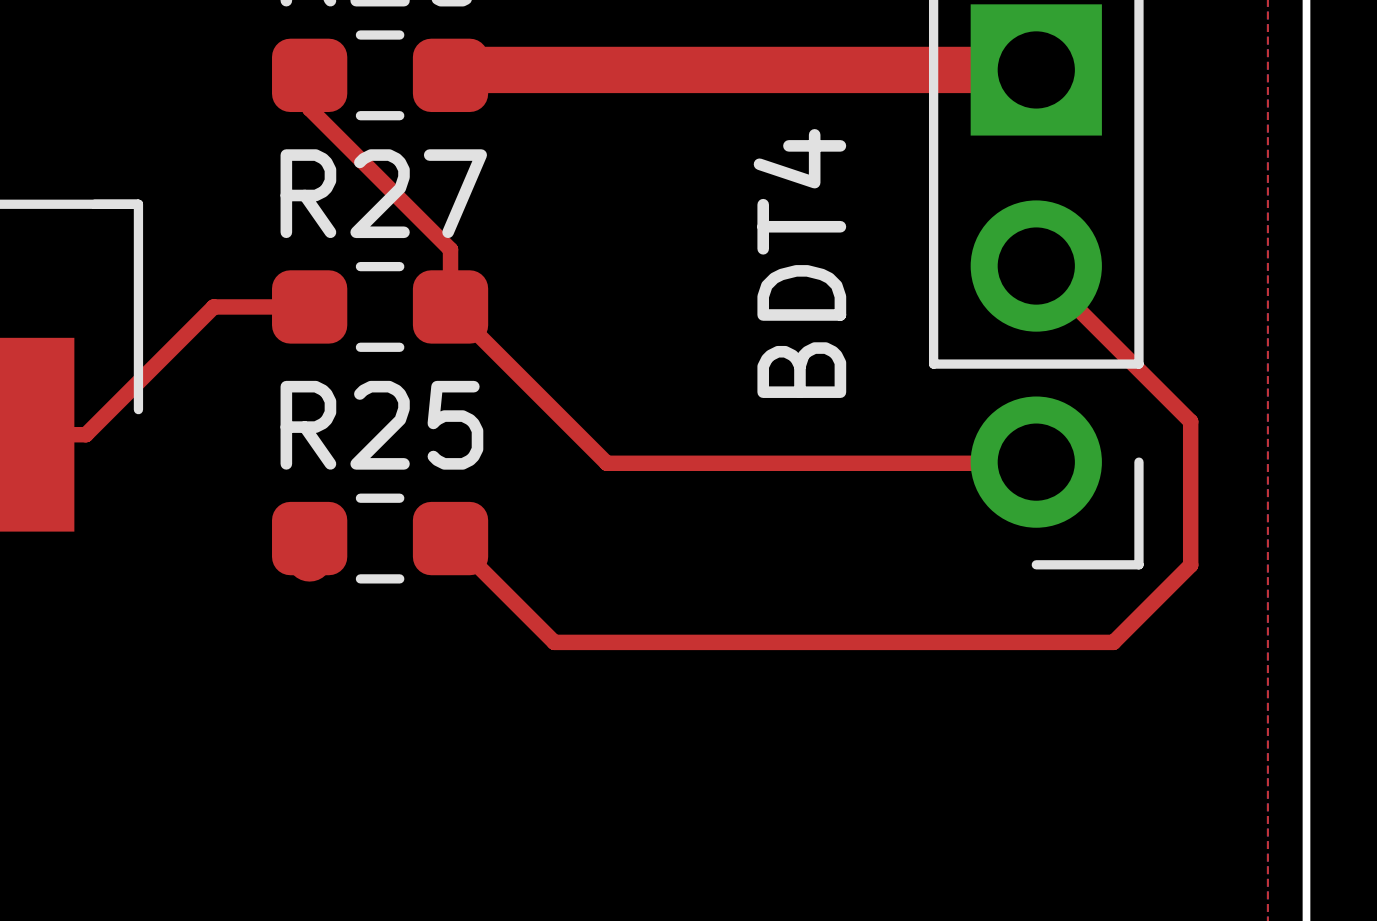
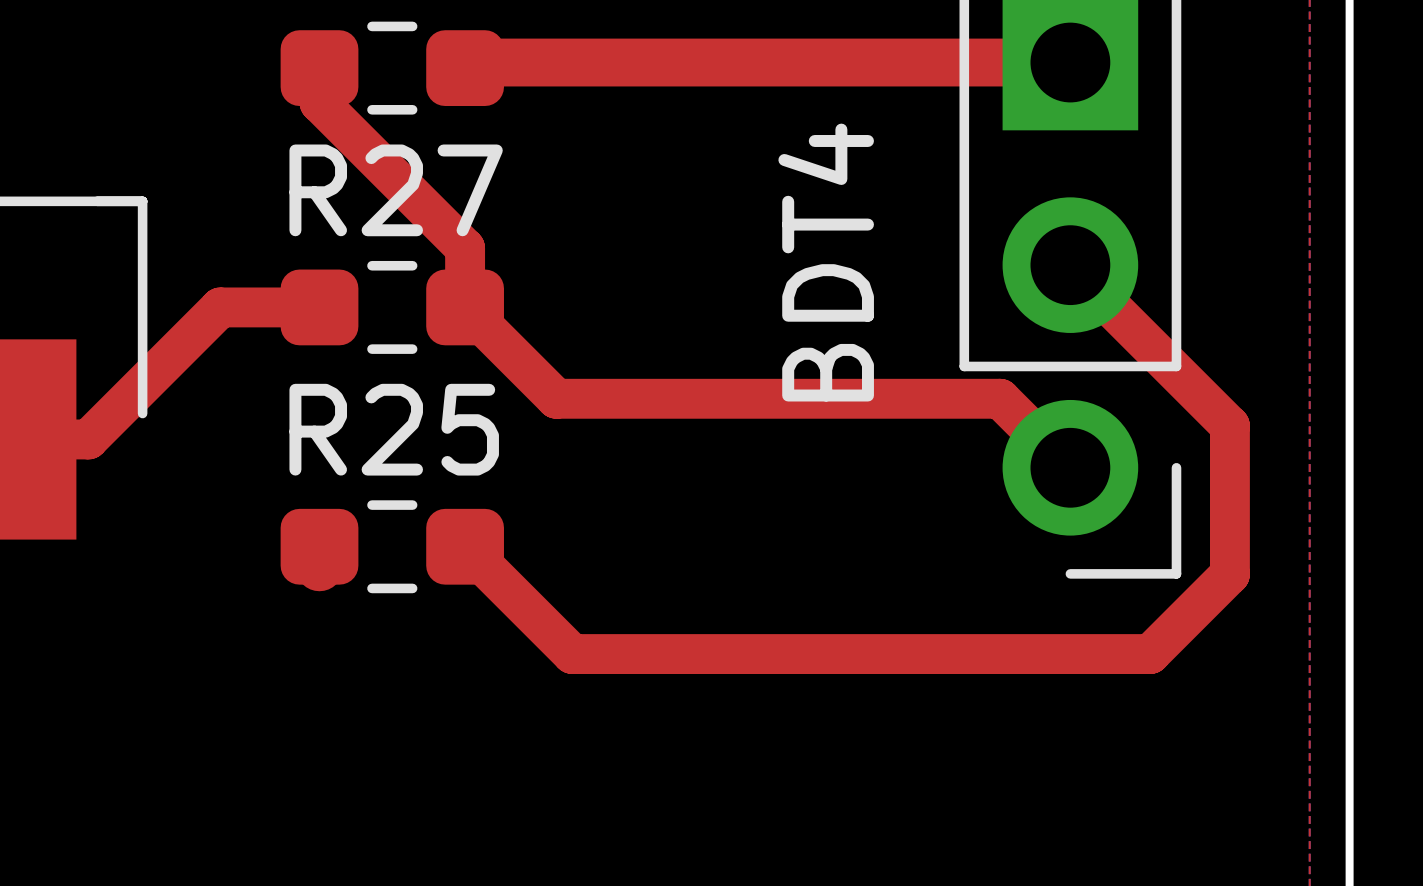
top track width: thin (309, 75) (309, 108) (450, 249) (450, 306) (538, 395) -> thick (319, 68) (319, 102) (465, 248) (465, 307) (556, 398)
top track width: thin (1036, 267) (1190, 421) (1190, 565) (1113, 642) (554, 642) (450, 538) -> thick (1070, 266) (1229, 425) (1229, 574) (1150, 654) (572, 654) (465, 546)
top track width: thin (309, 306) (213, 306) (85, 434) (35, 434) -> thick (319, 307) (220, 307) (88, 439) (36, 439)
top track: (538, 395) (606, 463) (1036, 463) -> (556, 398) (1000, 398) (1070, 468)

